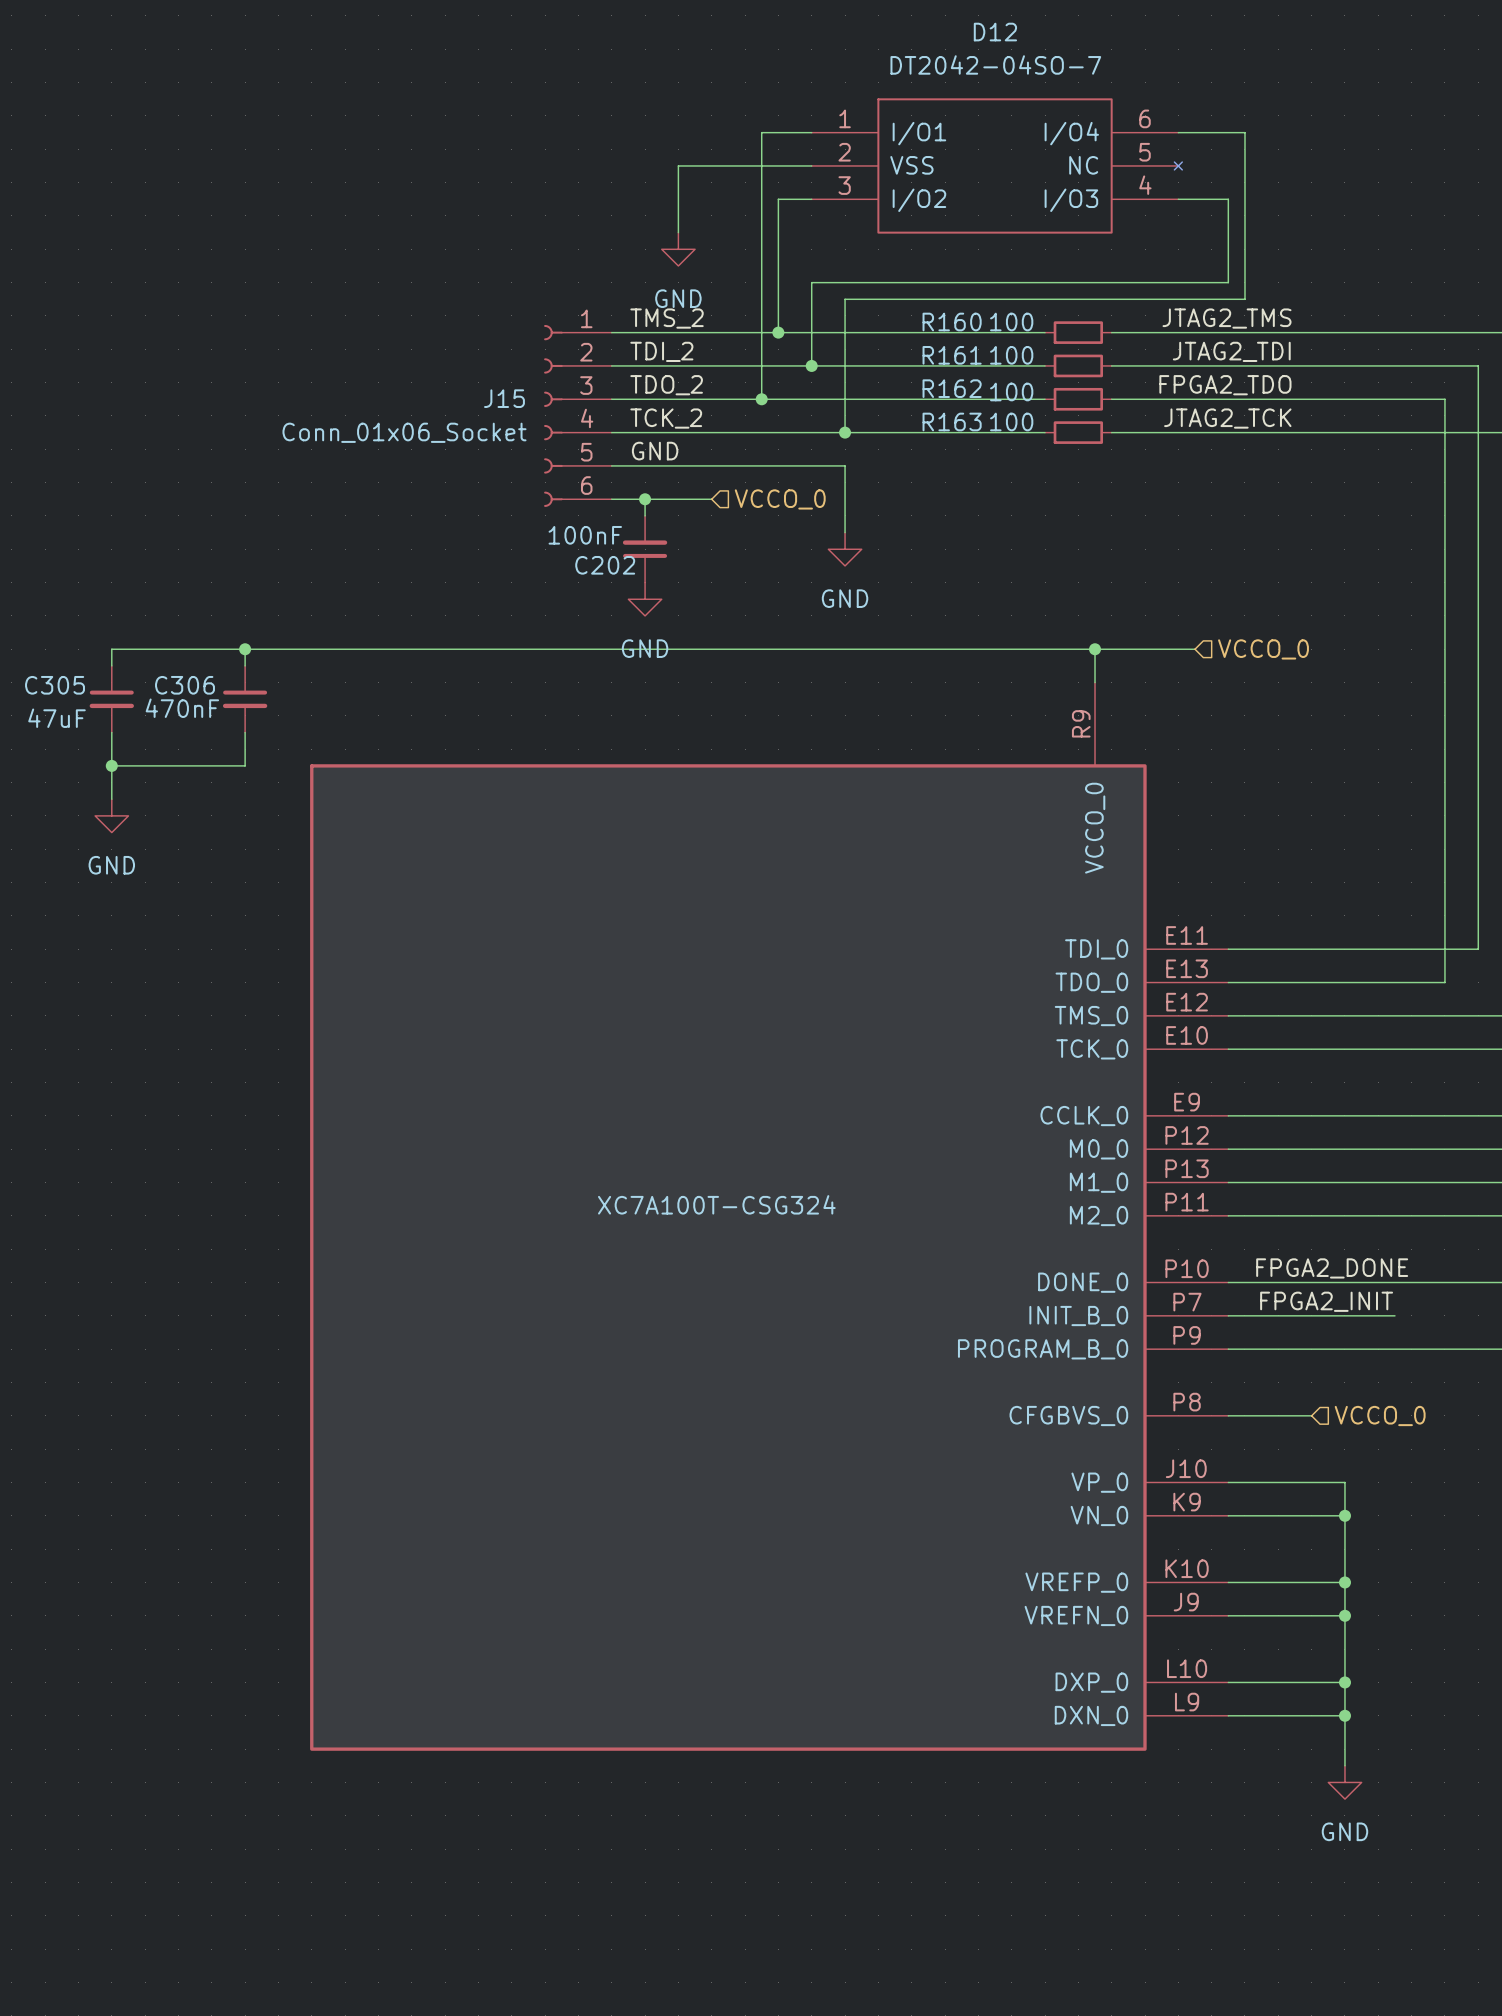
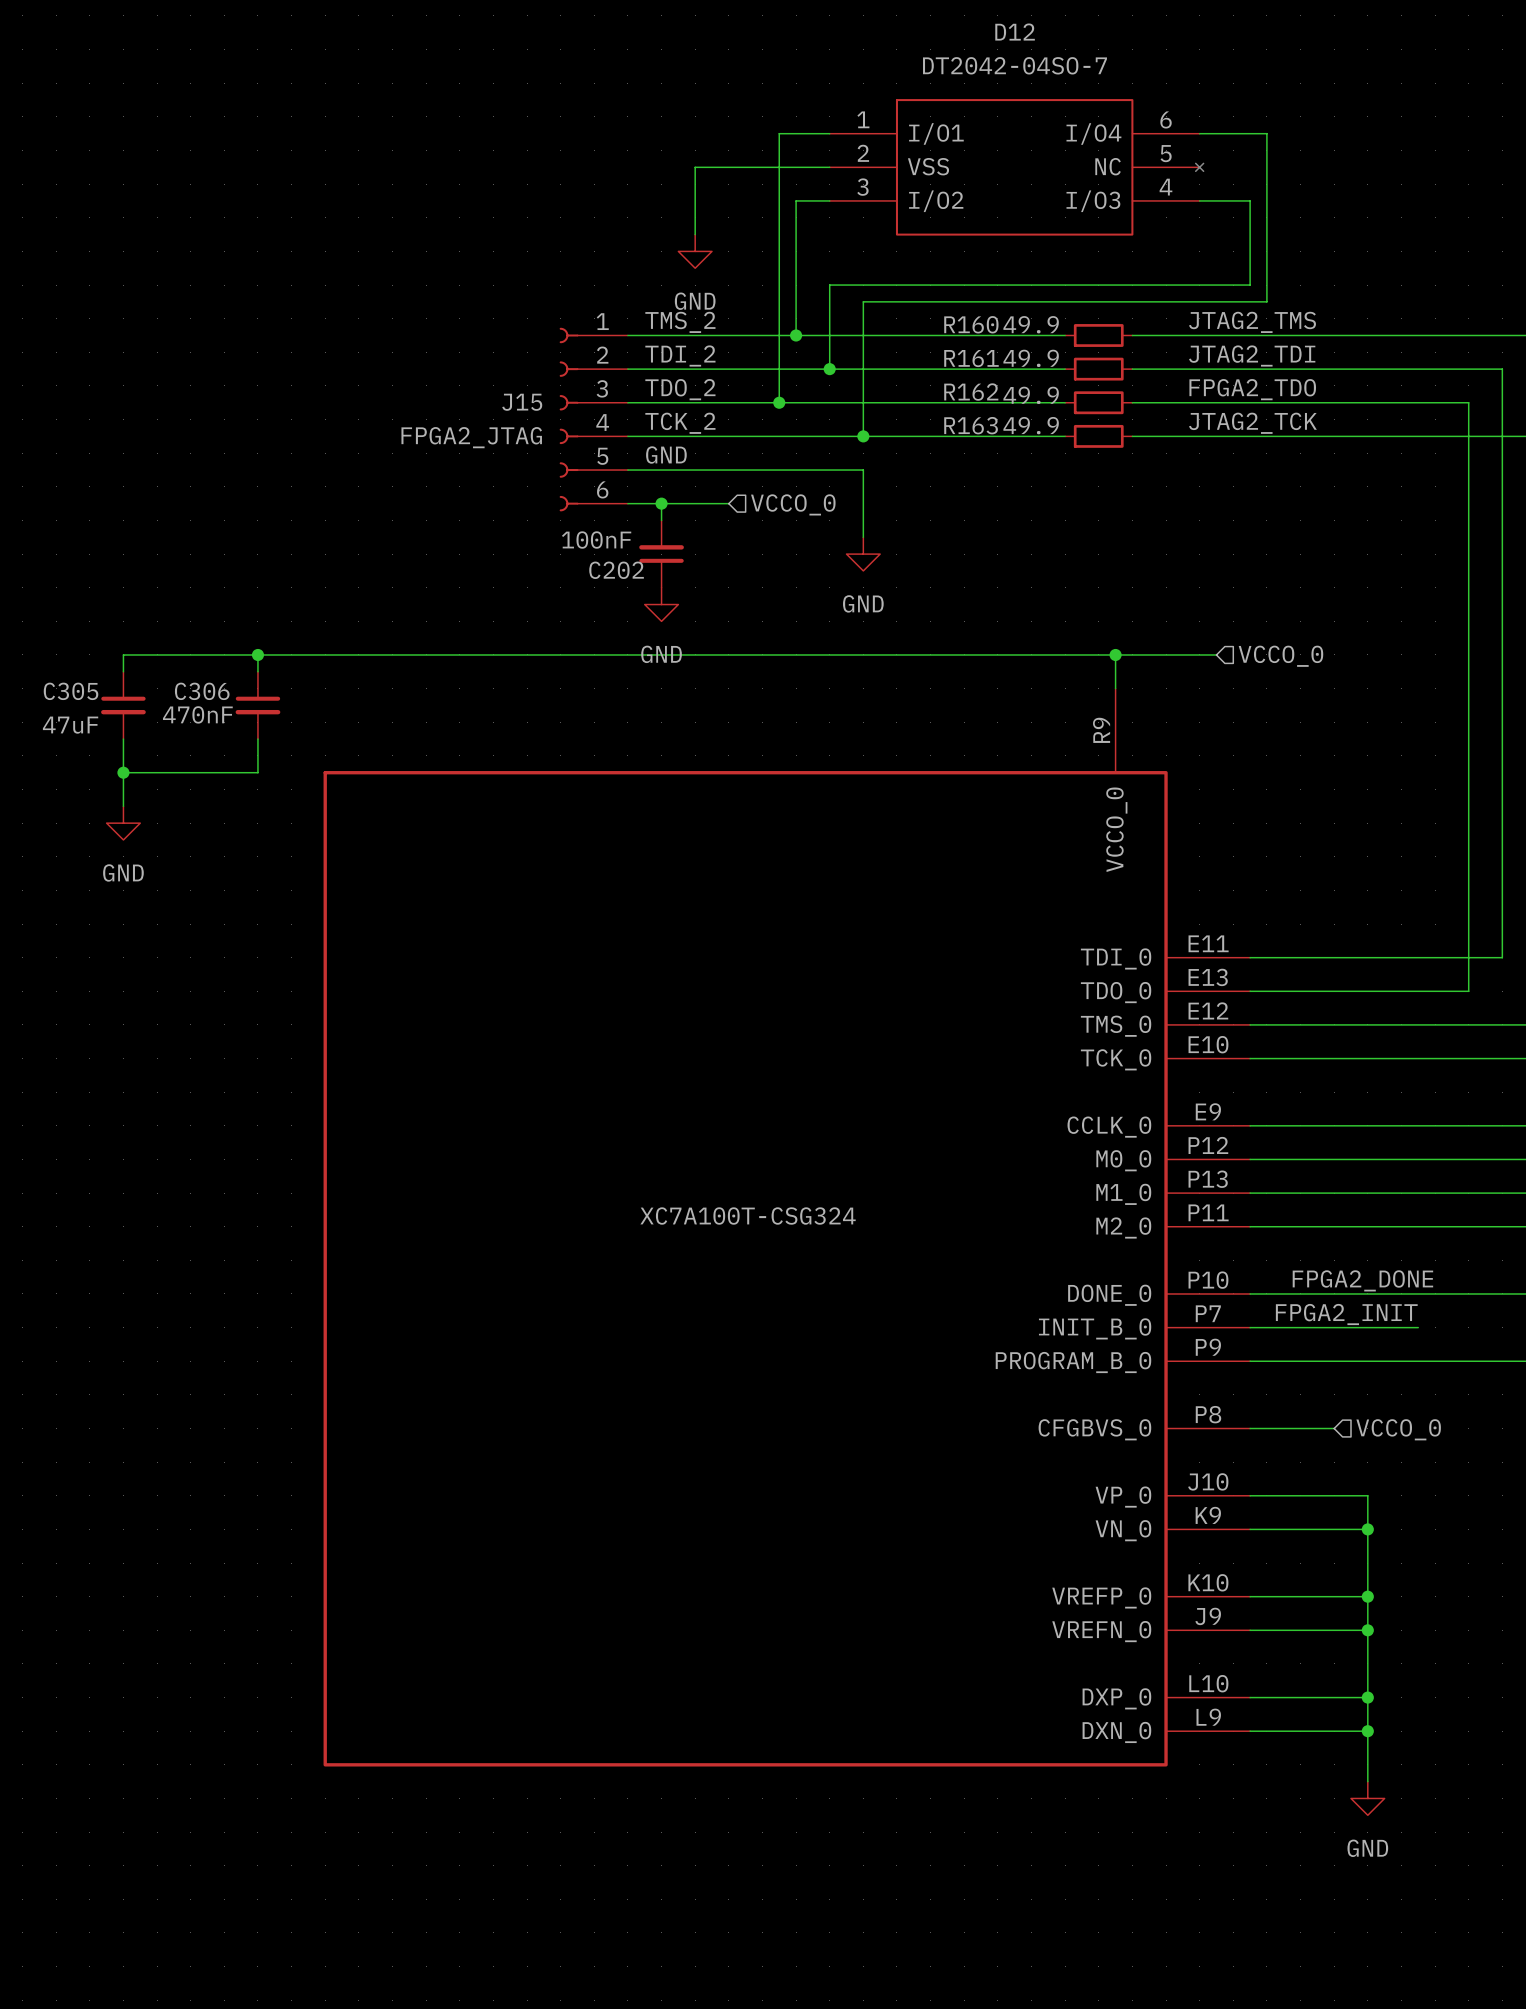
R160 value: 100 (1011, 322) -> 49.9 (1031, 324)
R161 value: 100 (1011, 355) -> 49.9 (1031, 358)
R162 value: 100 (1011, 391) -> 49.9 (1031, 395)
R163 value: 100 (1011, 421) -> 49.9 (1031, 425)
J15 value: Conn_01x06_Socket (404, 432) -> FPGA2_JTAG (471, 437)

